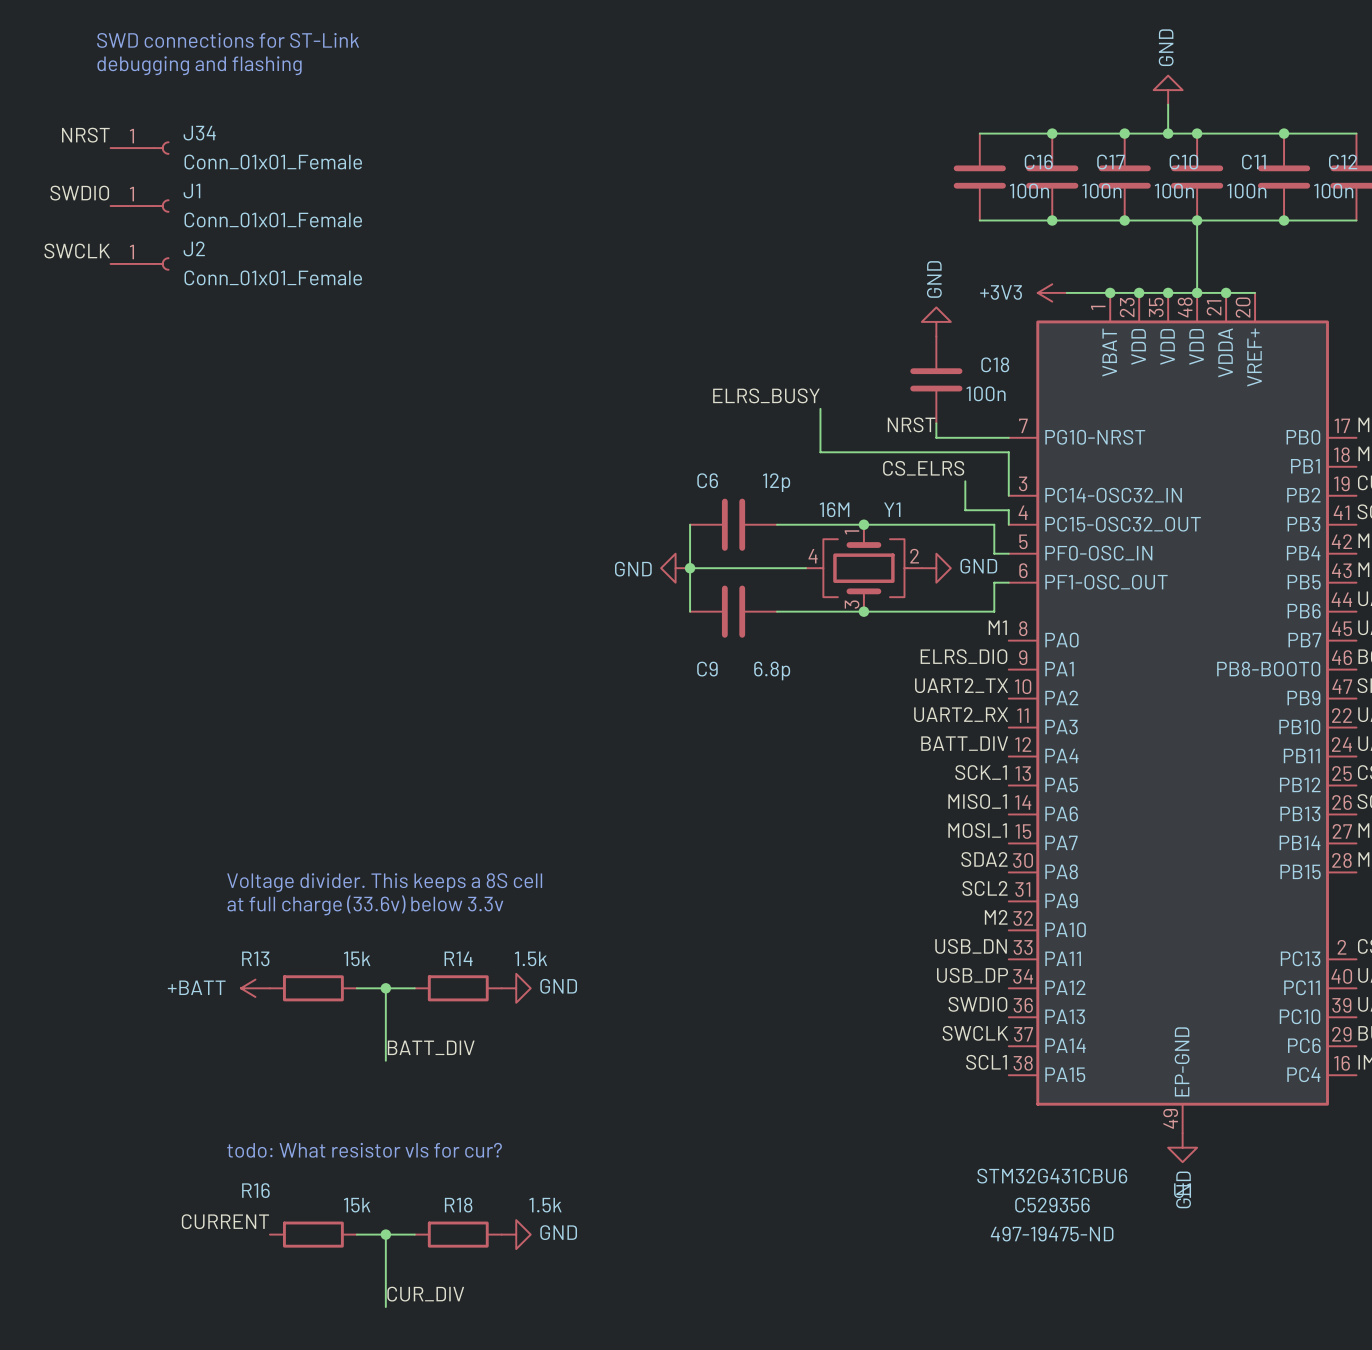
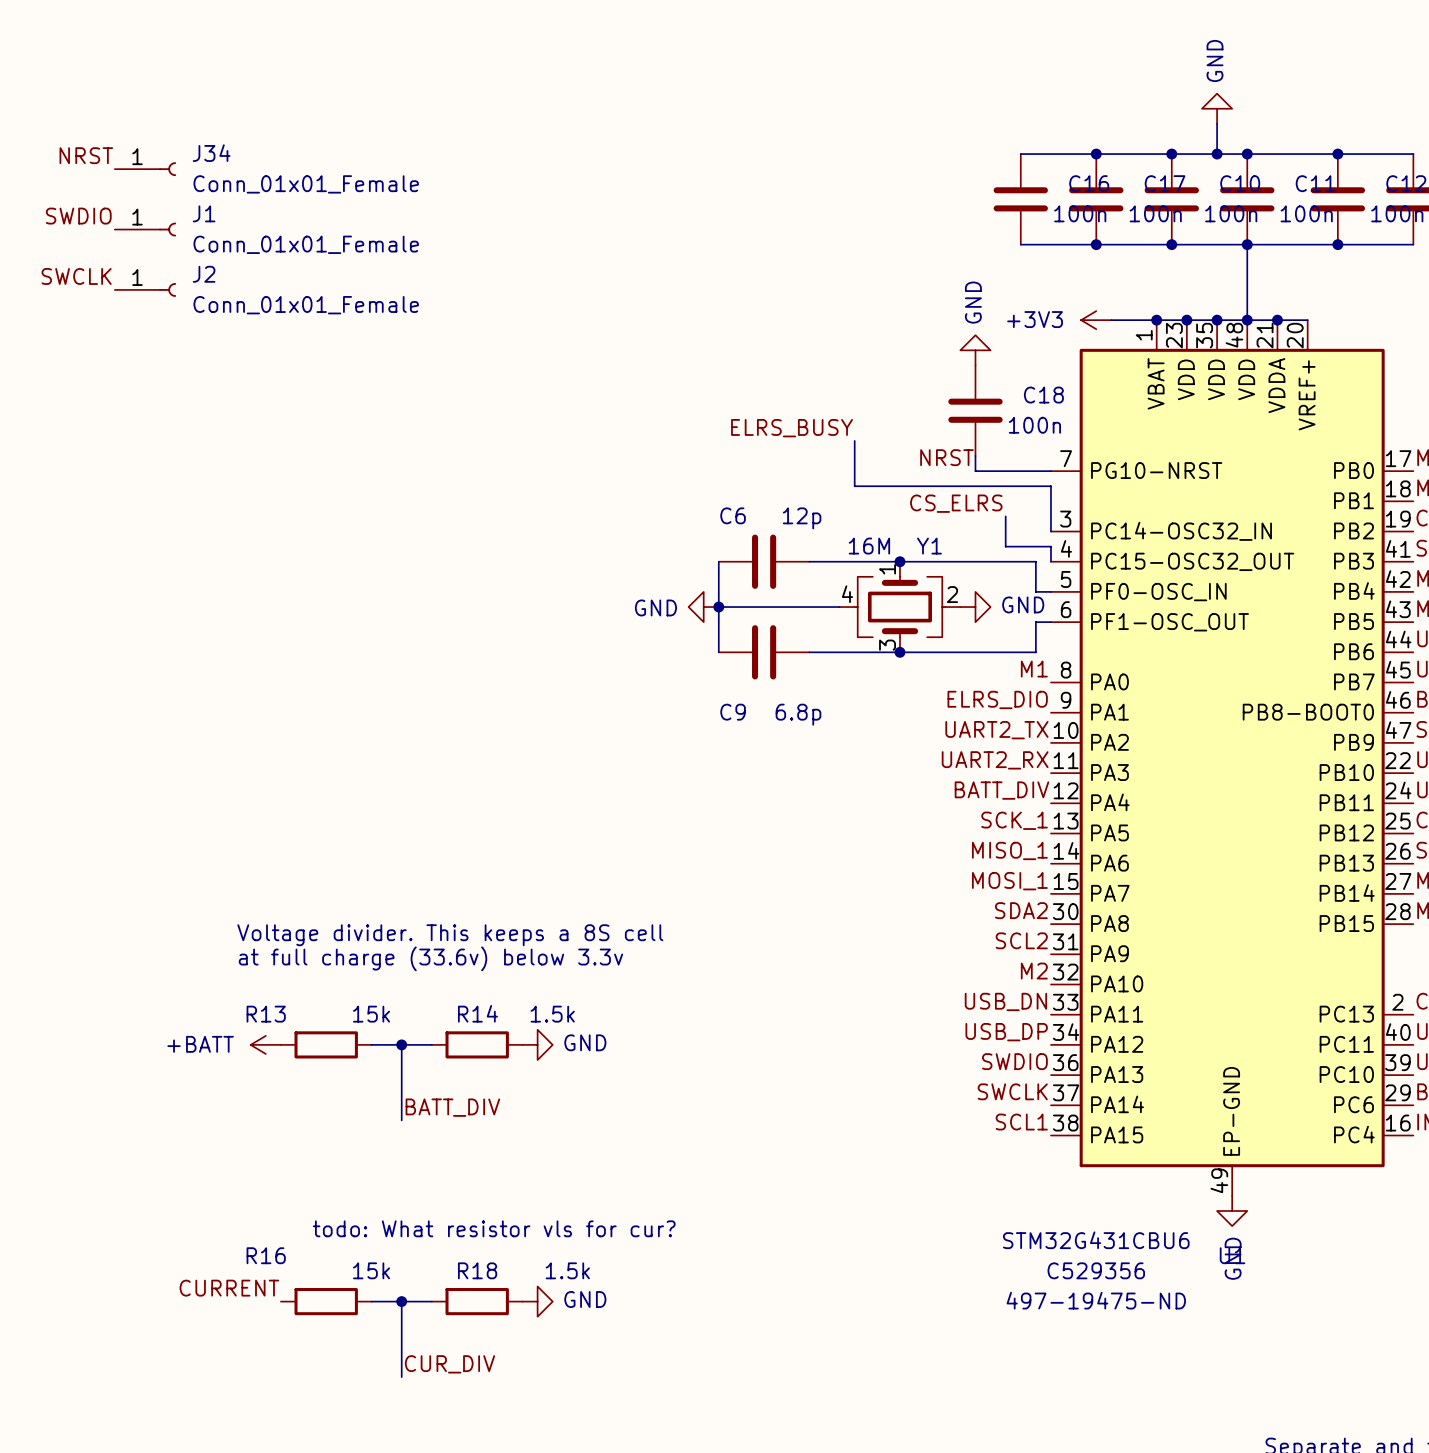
text: SWD connections for ST-Link (228, 40) -> none
text: debugging and flashing (199, 65) -> none
text position: todo: What resistor vls for cur? (364, 1150) -> todo: What resistor vls for cur? (494, 1228)

